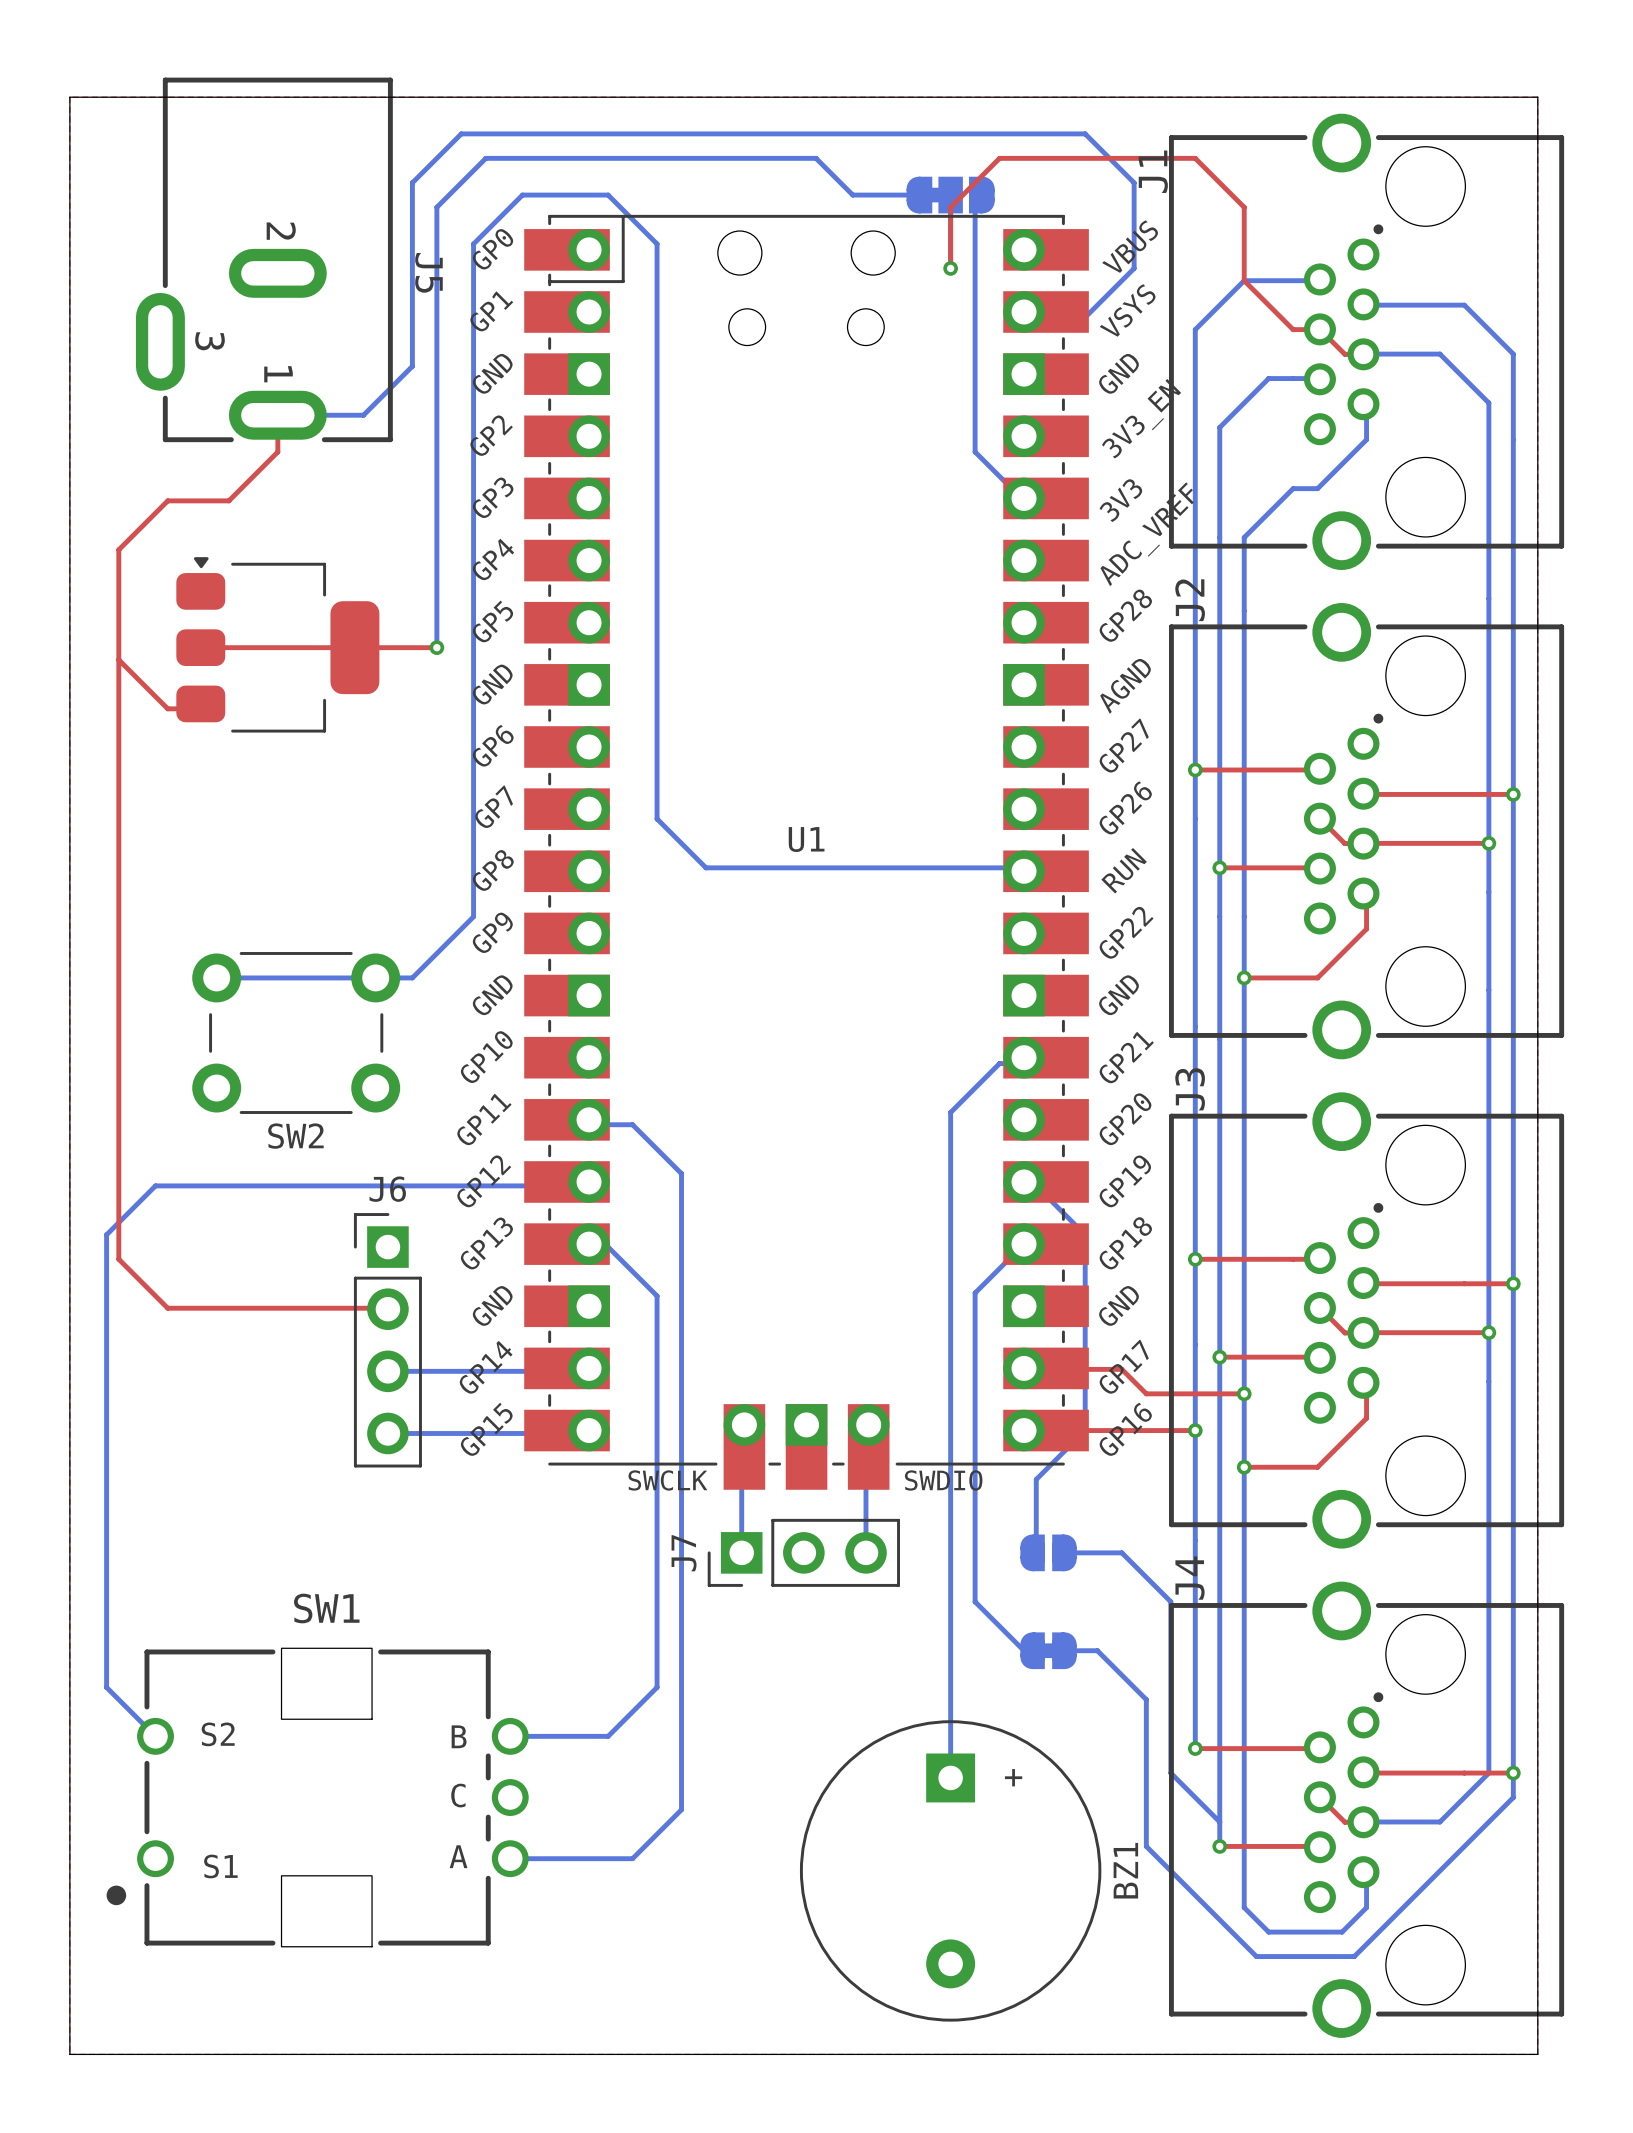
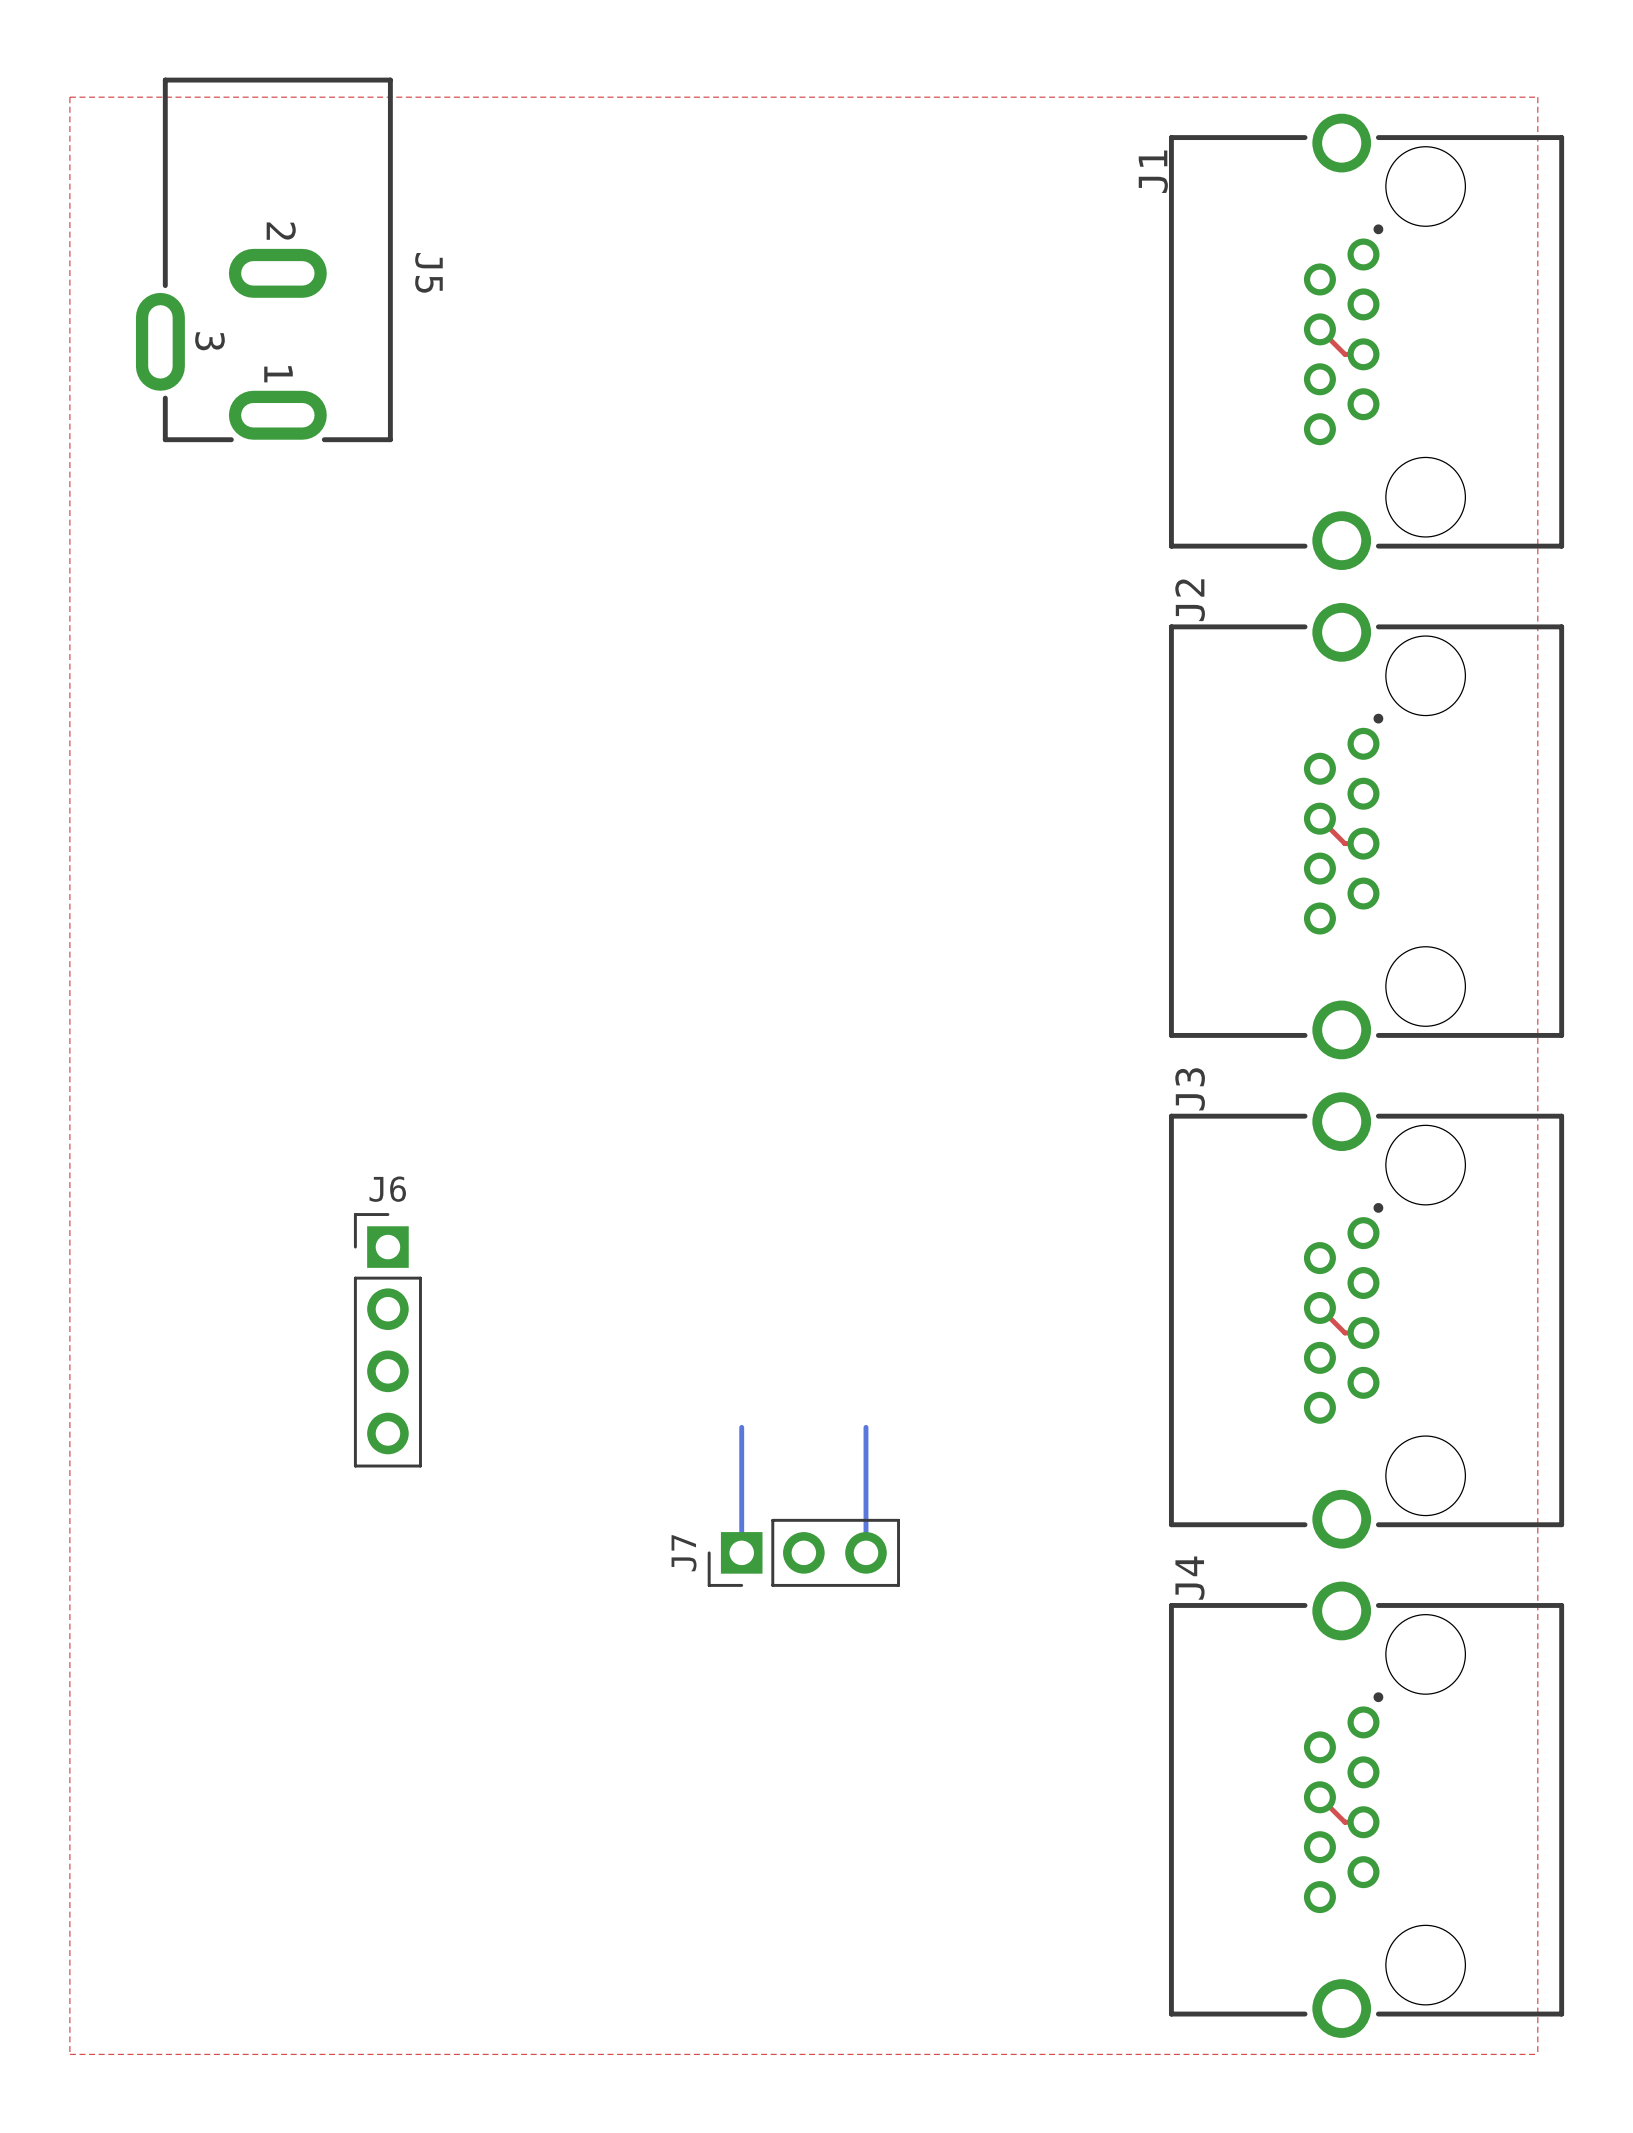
board edge: (69, 97) (1537, 97) (1537, 2054) (69, 2054) (69, 97) -> none
bottom track: (918, 195) (852, 195) (816, 158) (485, 158) (436, 207) (436, 647) -> none
part: (950, 195) -> none
bottom track: (982, 195) (975, 202) (975, 451) (1021, 498) (1024, 498) -> none
top track: (950, 268) (950, 207) (999, 158) (1195, 158) (1244, 207) (1244, 280) (1293, 329) (1319, 329) -> none
via: (950, 268) -> none
bottom track: (1318, 280) (1244, 280) (1195, 329) (1195, 1748) -> none
bottom track: (1363, 304) (1464, 305) (1513, 354) (1513, 1797) (1354, 1956) (1256, 1956) (1146, 1846) (1146, 1699) (1097, 1650) (1064, 1650) -> none
bottom track: (1024, 312) (1029, 317) (1085, 317) (1134, 268) (1134, 182) (1085, 133) (461, 133) (412, 182) (412, 366) (363, 415) (277, 415) -> none
bottom track: (1363, 354) (1439, 354) (1488, 403) (1488, 1773) (1439, 1821) (1363, 1821) -> none
bottom track: (1319, 379) (1268, 378) (1219, 427) (1219, 1846) -> none
bottom track: (1363, 404) (1366, 407) (1366, 439) (1317, 488) (1293, 488) (1244, 537) (1244, 1907) (1268, 1932) (1342, 1932) (1366, 1907) (1366, 1875) (1363, 1872) -> none
top track: (277, 415) (277, 451) (228, 500) (167, 500) (118, 549) (118, 1259) (167, 1308) (387, 1309) -> none
part: (277, 644) -> none
top track: (200, 647) (436, 647) -> none
via: (436, 647) -> none
top track: (118, 659) (167, 708) (195, 708) (200, 703) -> none
top track: (1319, 768) (1195, 769) -> none
via: (1195, 769) -> none
top track: (1363, 793) (1513, 794) -> none
via: (1513, 794) -> none
top track: (1363, 843) (1488, 843) -> none
via: (1488, 843) -> none
U1: (806, 852) -> none
top track: (1219, 867) (1319, 868) -> none
via: (1219, 867) -> none
bottom track: (1024, 871) (1020, 867) (705, 867) (657, 818) (657, 243) (608, 195) (522, 195) (473, 243) (473, 916) (412, 977) (216, 977) -> none
top track: (1363, 893) (1366, 896) (1366, 929) (1317, 977) (1244, 977) -> none
via: (1244, 977) -> none
SW2: (296, 1032) -> none
bottom track: (1024, 1057) (1018, 1063) (999, 1063) (950, 1112) (950, 1777) -> none
bottom track: (589, 1119) (593, 1124) (632, 1124) (681, 1173) (681, 1809) (632, 1858) (510, 1858) -> none
bottom track: (589, 1181) (585, 1185) (155, 1185) (106, 1234) (106, 1687) (155, 1736) -> none
bottom track: (1024, 1181) (1032, 1181) (1085, 1234) (1085, 1430) (1036, 1479) (1036, 1549) (1032, 1552) -> none
bottom track: (589, 1244) (591, 1247) (608, 1247) (657, 1295) (657, 1687) (608, 1736) (510, 1736) -> none
bottom track: (1024, 1244) (975, 1293) (975, 1601) (1024, 1650) (1032, 1650) -> none
top track: (1319, 1258) (1195, 1259) -> none
via: (1195, 1259) -> none
top track: (1363, 1283) (1513, 1283) -> none
via: (1513, 1283) -> none
top track: (1363, 1332) (1488, 1332) -> none
via: (1488, 1332) -> none
top track: (1219, 1357) (1319, 1357) -> none
via: (1219, 1357) -> none
bottom track: (589, 1368) (586, 1371) (387, 1371) -> none
top track: (1024, 1368) (1121, 1369) (1146, 1393) (1244, 1393) -> none
top track: (1363, 1382) (1366, 1385) (1366, 1418) (1317, 1467) (1244, 1467) -> none
via: (1244, 1393) -> none
bottom track: (589, 1430) (586, 1433) (387, 1433) -> none
top track: (1024, 1430) (1195, 1430) -> none
via: (1195, 1430) -> none
via: (1244, 1467) -> none
part: (1048, 1552) -> none
bottom track: (1064, 1552) (1121, 1552) (1170, 1601) (1170, 1773) (1219, 1821) -> none
part: (1048, 1650) -> none
top track: (1319, 1747) (1195, 1748) -> none
via: (1195, 1748) -> none
top track: (1363, 1772) (1513, 1773) -> none
via: (1513, 1773) -> none
SW1: (317, 1797) -> none
top track: (1219, 1846) (1319, 1847) -> none
via: (1219, 1846) -> none
BZ1: (950, 1870) -> none

